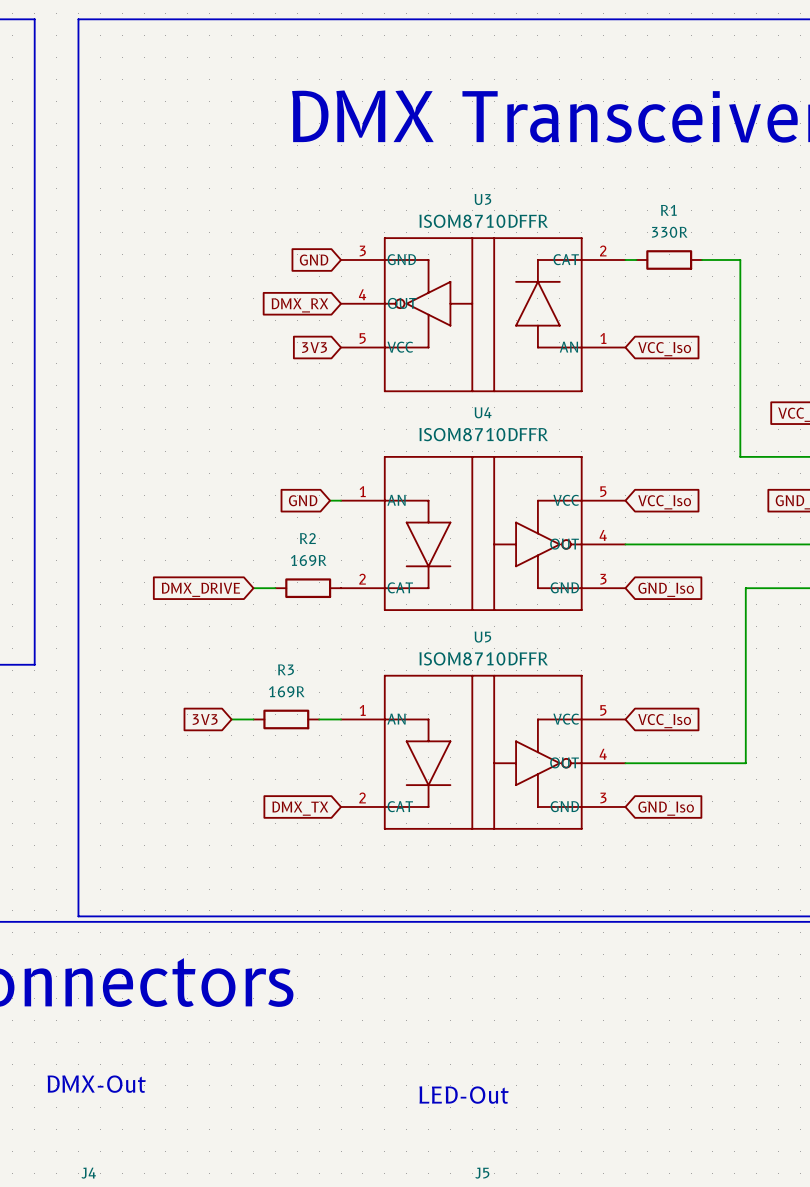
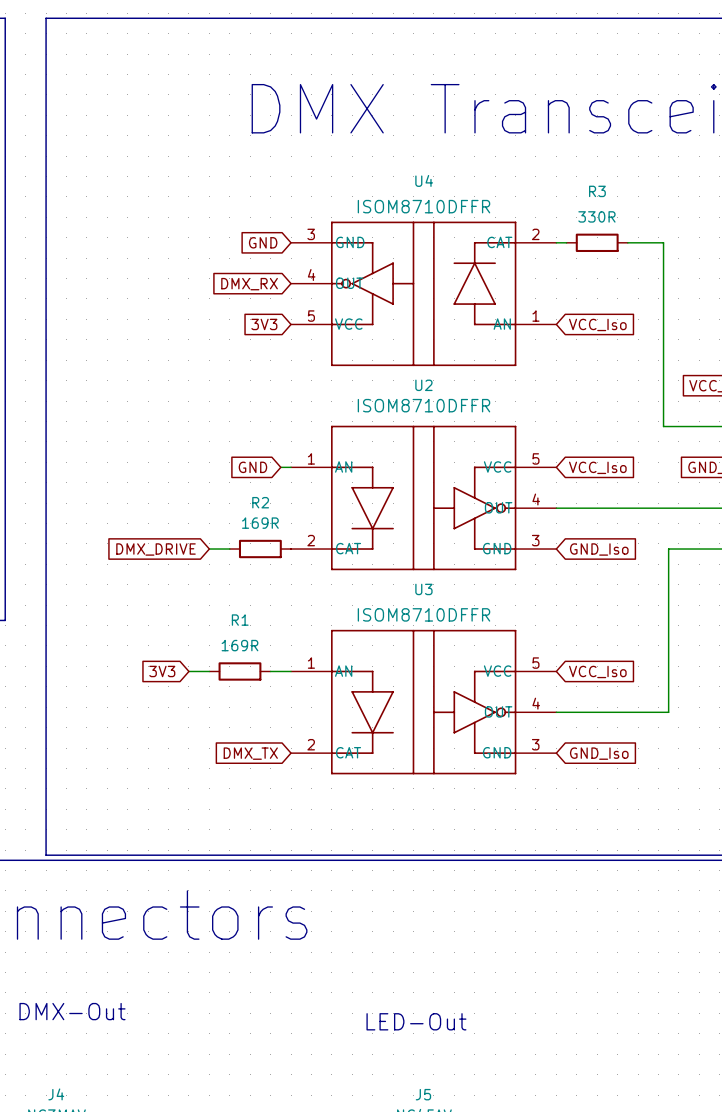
U3 name: U3 (482, 199) -> U4 (424, 180)
R1 name: R1 (668, 210) -> R3 (597, 191)
U4 name: U4 (483, 412) -> U2 (423, 385)
U5 name: U5 (482, 637) -> U3 (423, 589)
R3 name: R3 (286, 669) -> R1 (240, 620)

